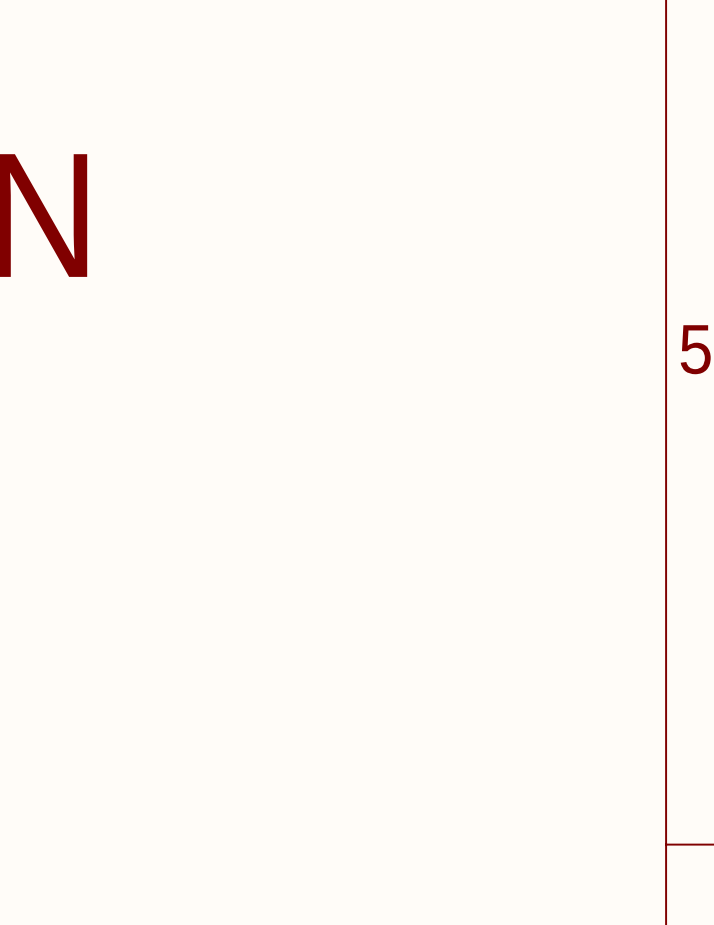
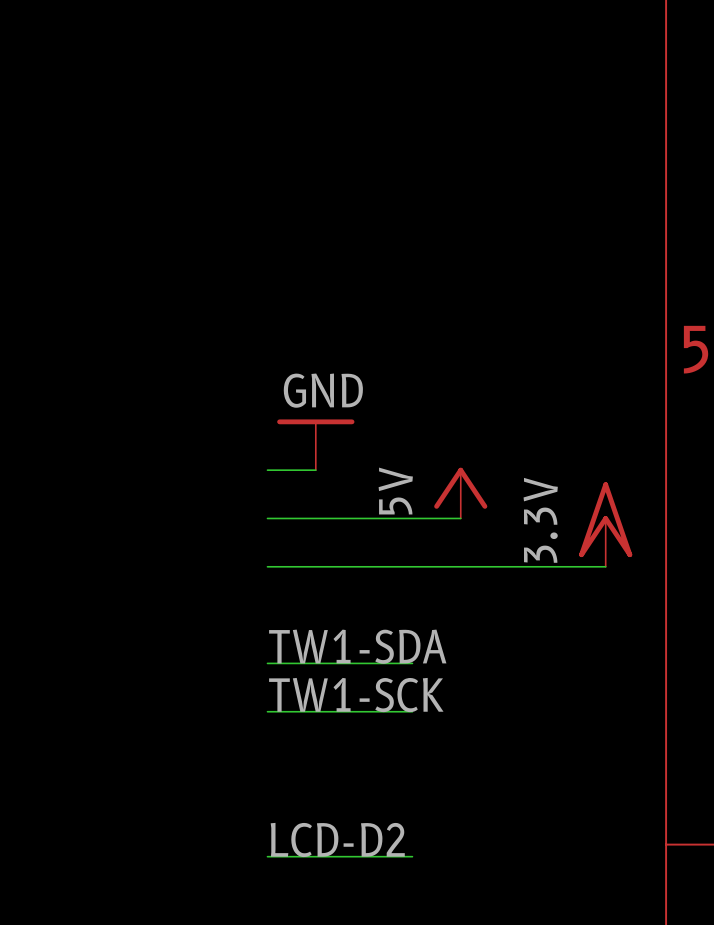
power symbol: none -> GND (315, 444)
wire: none -> (267, 470) (315, 470)
power symbol: none -> 5V (460, 493)
wire: none -> (267, 518) (460, 518)
power symbol: none -> 3.3V (605, 524)
wire: none -> (267, 566) (605, 566)
label: none -> TW1-SDA (357, 646)
wire: none -> (267, 663) (412, 663)
label: none -> TW1-SCK (356, 695)
wire: none -> (267, 711) (412, 711)
label: none -> LCD-D2 (337, 839)
wire: none -> (267, 856) (412, 856)

